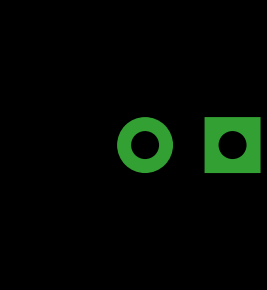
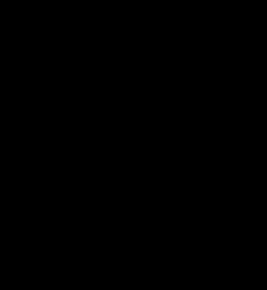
part: (188, 145) -> none

